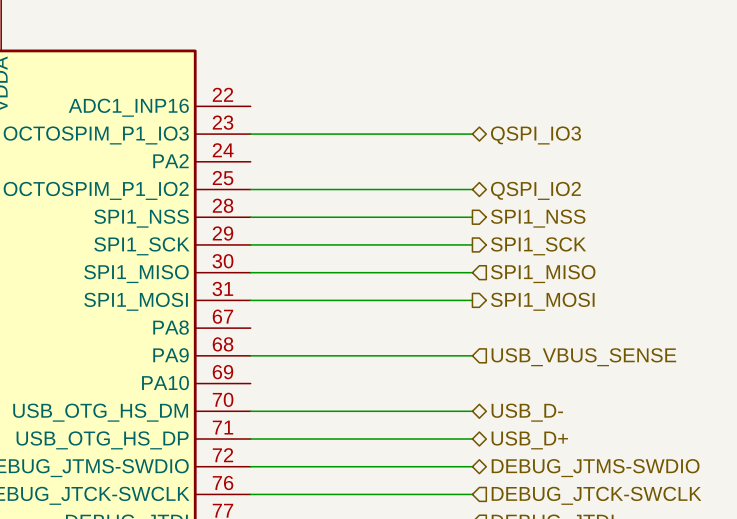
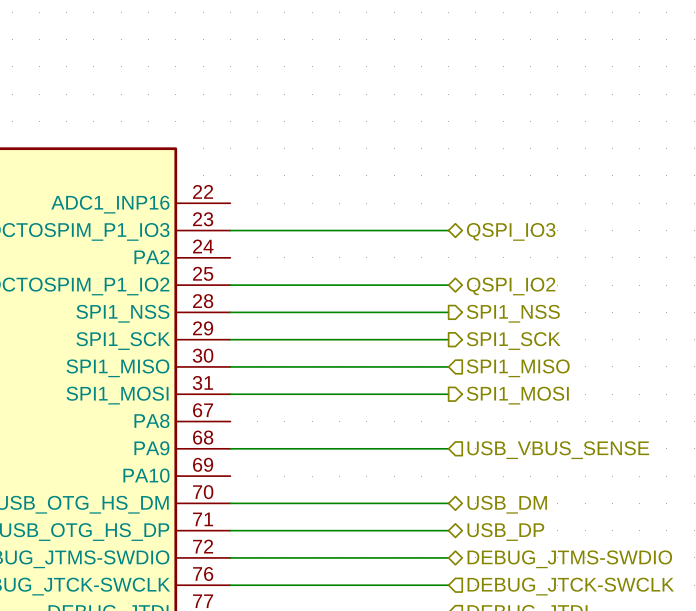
hierarchical label: USB_D- (527, 412) -> USB_DM (507, 504)
hierarchical label: USB_D+ (529, 440) -> USB_DP (505, 532)

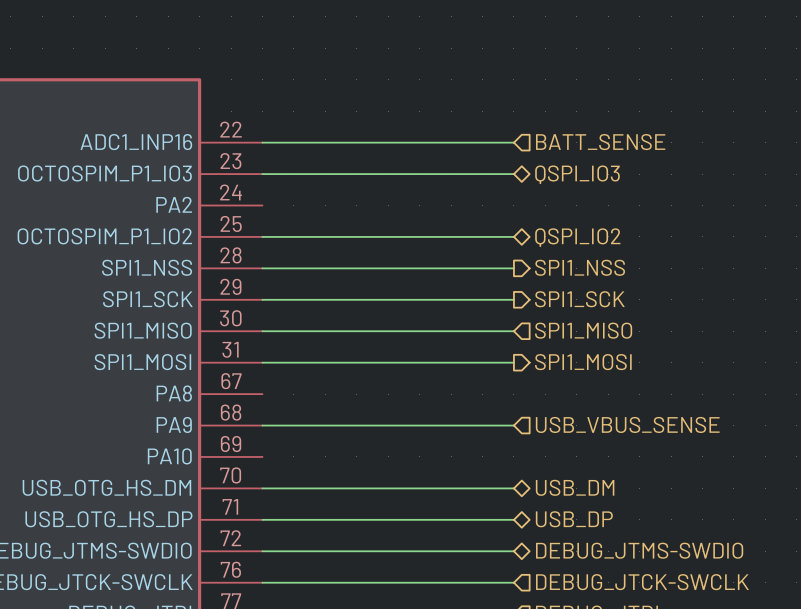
wire: none -> (262, 142) (513, 142)
hierarchical label: none -> BATT_SENSE (600, 142)

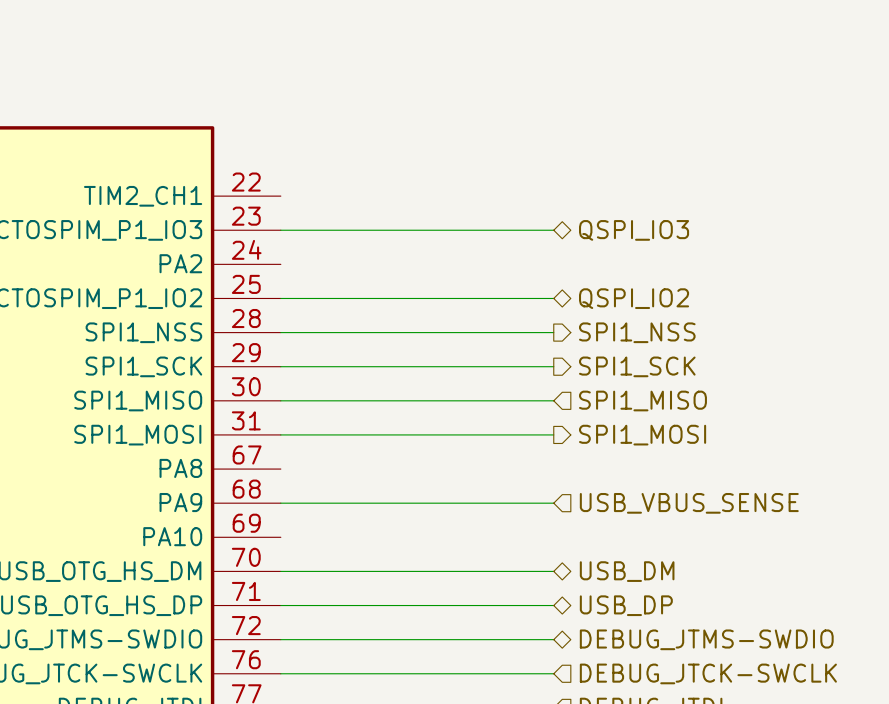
part pin name: ADC1_INP16 (136, 142) -> TIM2_CH1 (143, 196)
wire: (262, 142) (513, 142) -> none
hierarchical label: BATT_SENSE (600, 142) -> none

